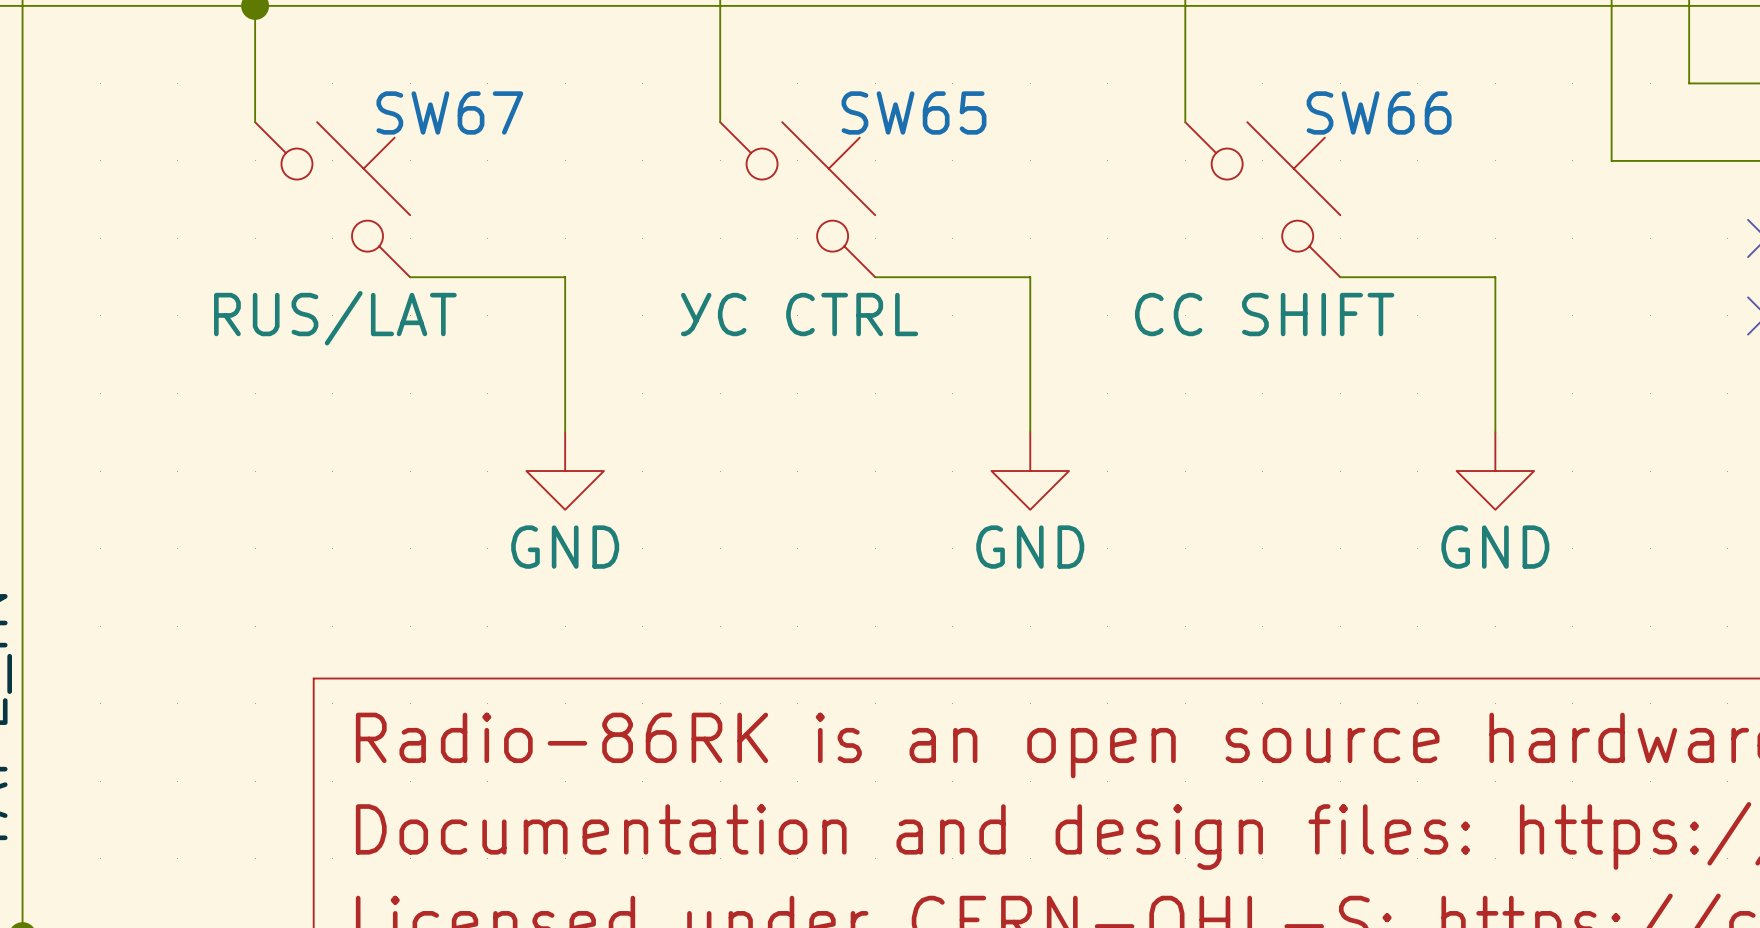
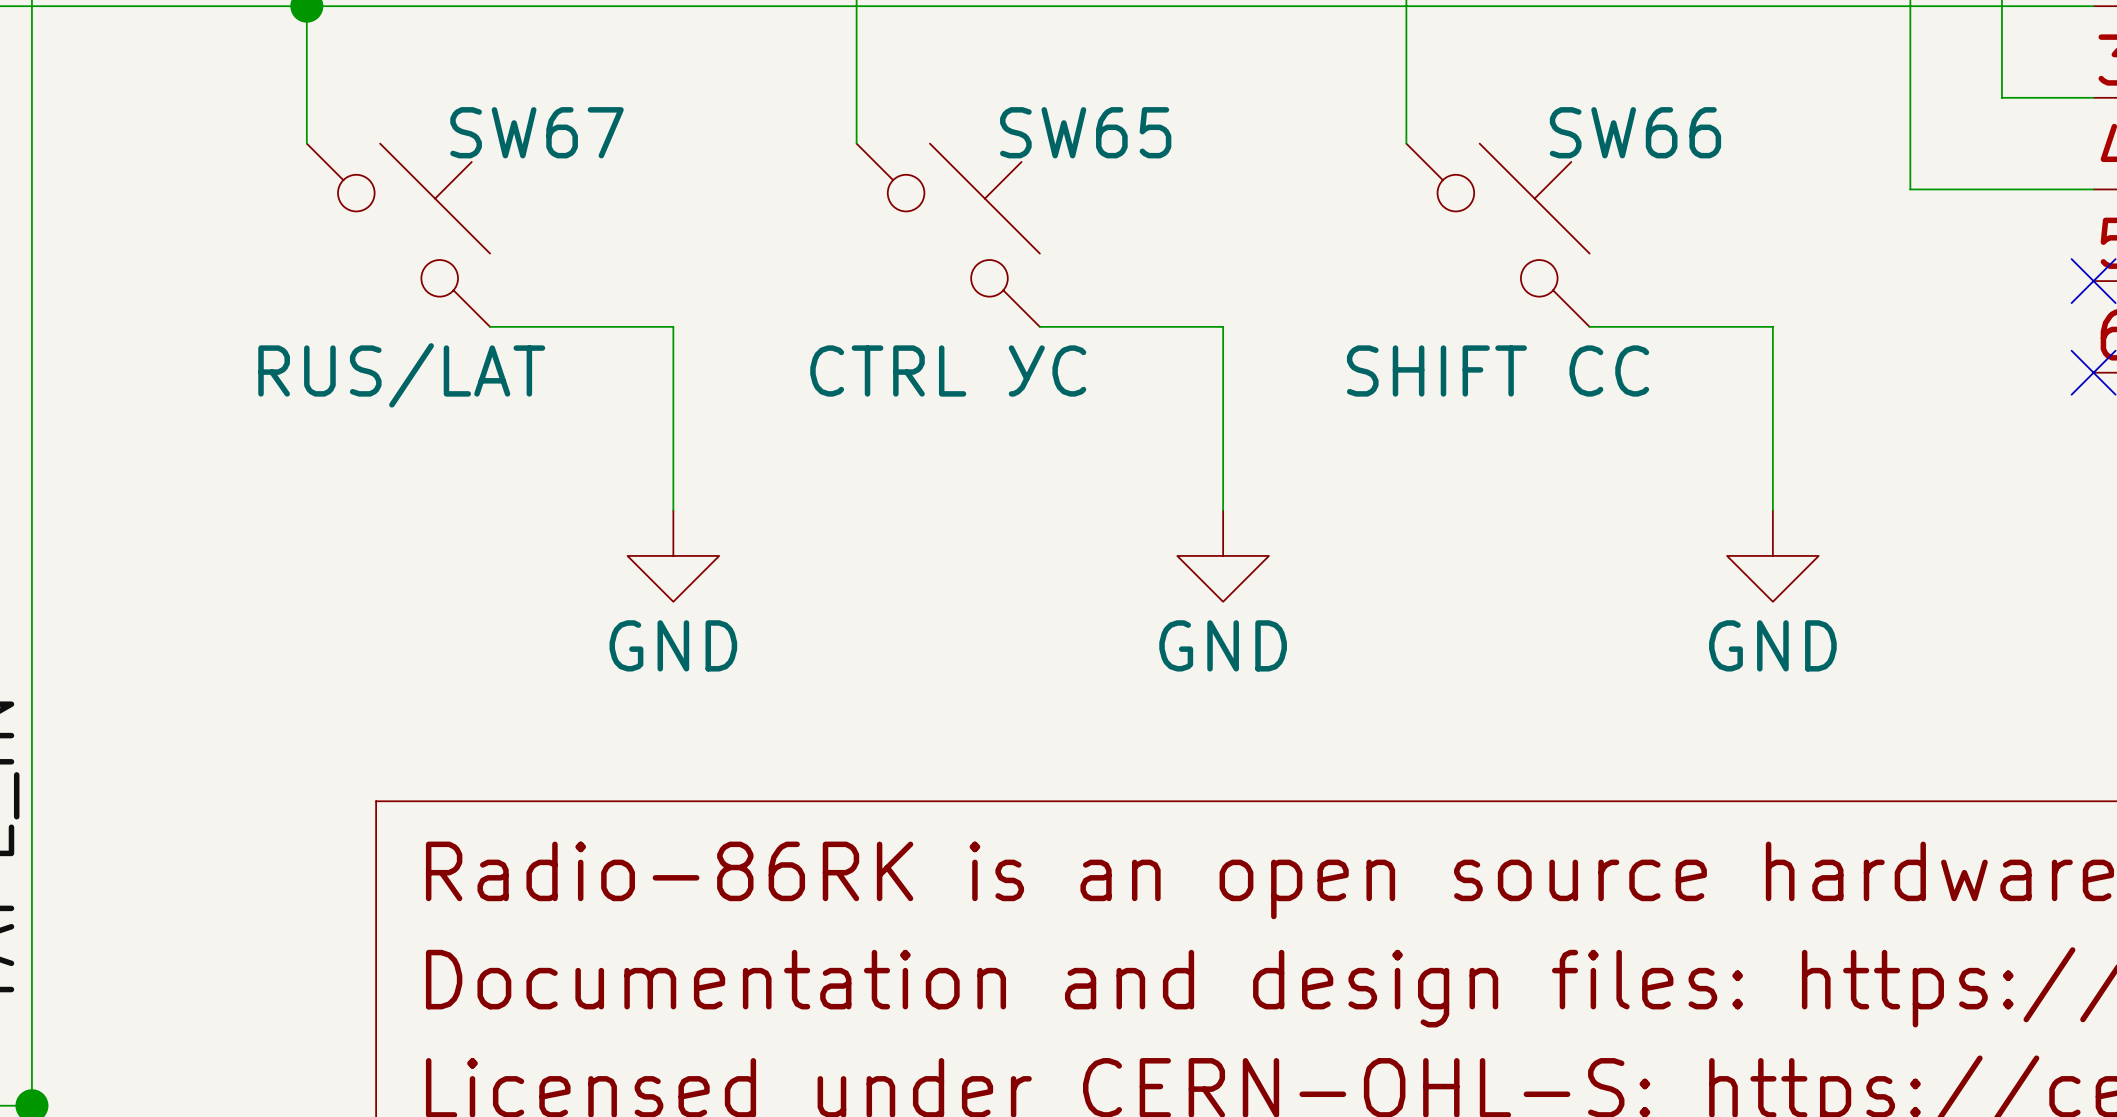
SW65 value: УС CTRL (799, 314) -> CTRL УС (948, 370)
SW66 value: CC SHIFT (1264, 314) -> SHIFT CC (1498, 370)

